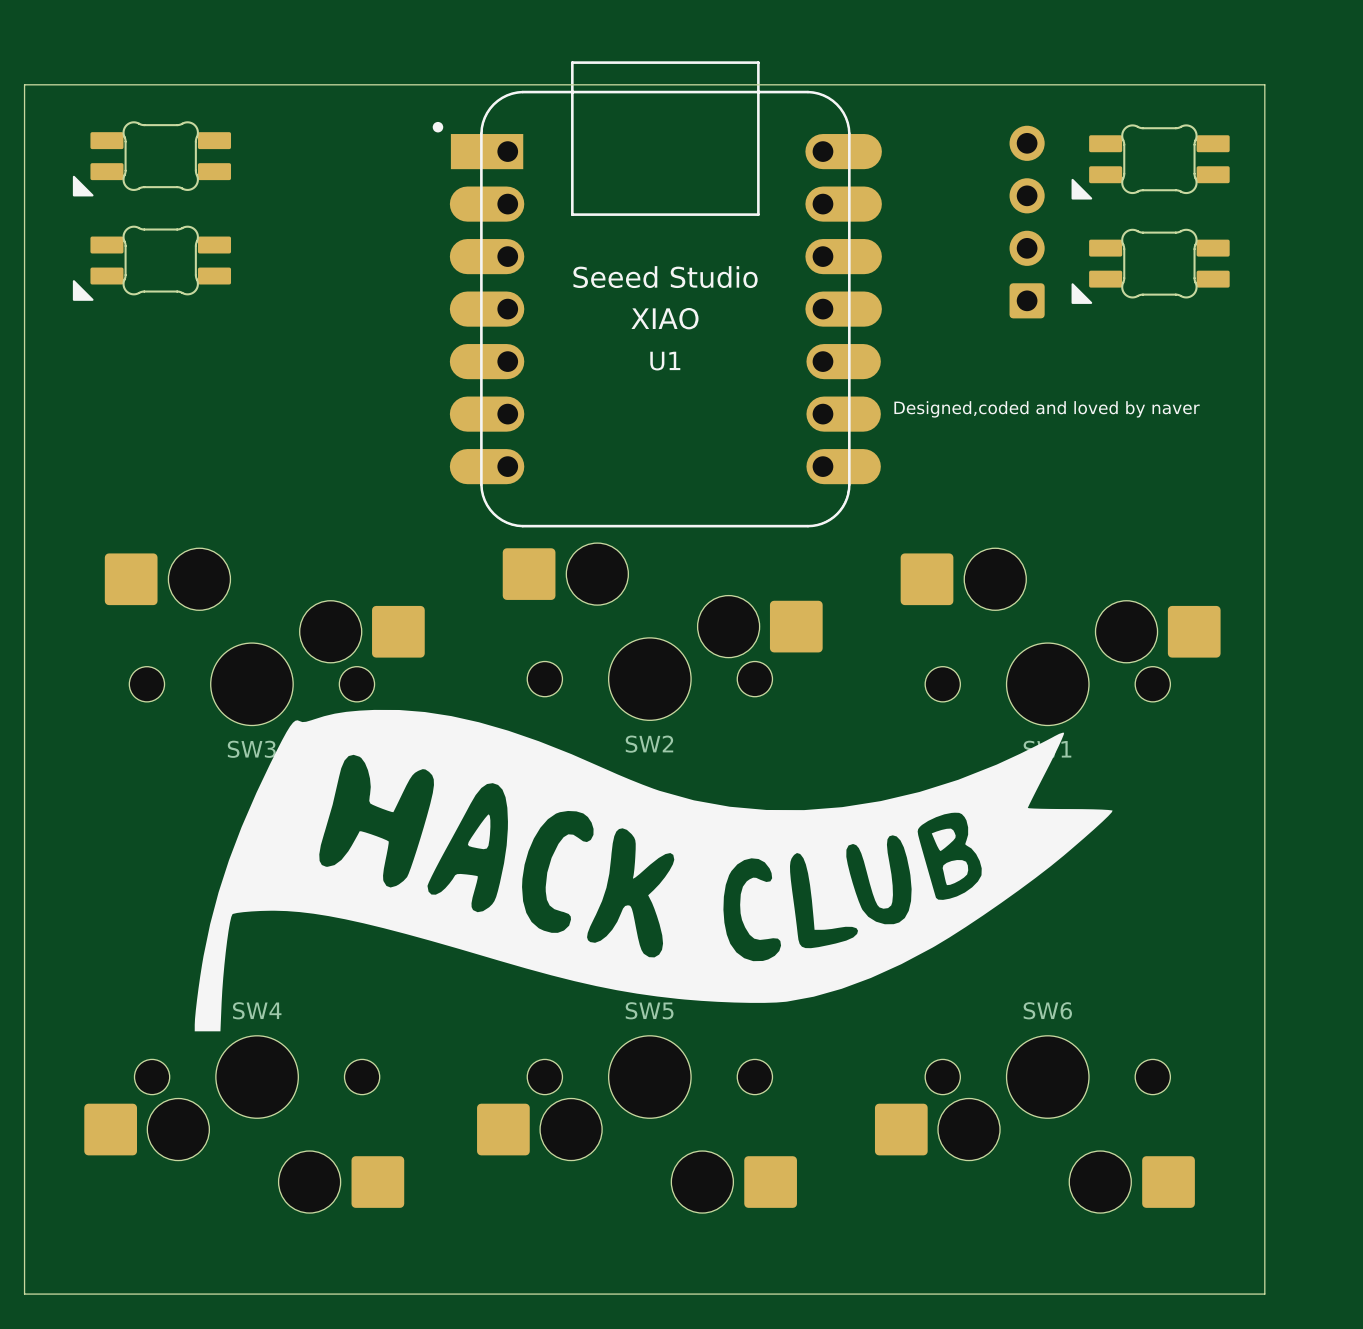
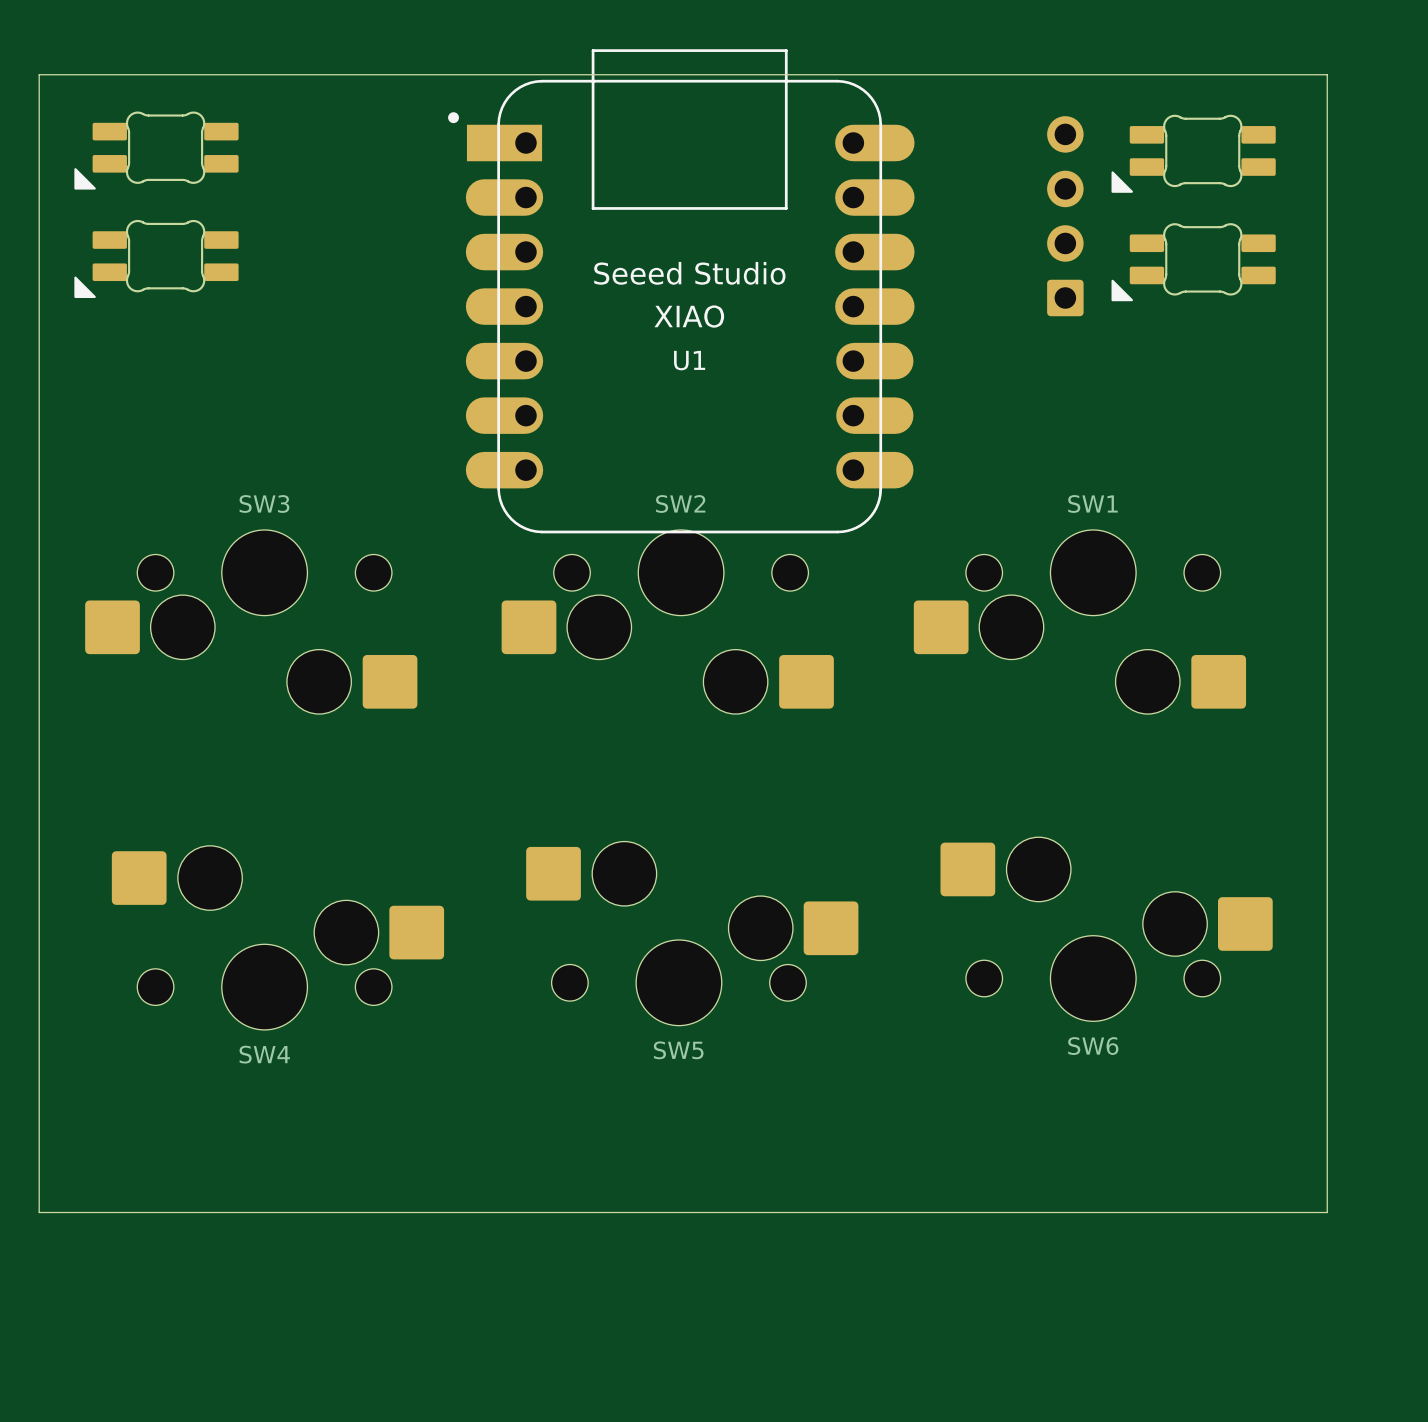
board edge: (24, 84) (1264, 84) (1264, 1294) (24, 1294) (24, 84) -> (39, 74) (39, 1212) (1327, 1212) (1327, 74) (39, 74)
text: Designed,coded and loved by naver (1047, 409) -> none
SW2 rotation: 0° (662, 631) -> 180° (667, 622)
SW3 rotation: 0° (264, 636) -> 180° (251, 622)
SW1 rotation: 0° (1060, 636) -> 180° (1079, 622)
drawing: [194, 709, 1113, 1032] -> none
SW4 rotation: 0° (244, 1124) -> 180° (277, 937)
SW4 position: (244, 1124) -> (277, 937)
SW5 rotation: 0° (637, 1124) -> 180° (692, 933)
SW5 position: (637, 1124) -> (692, 933)
SW6 rotation: 0° (1034, 1124) -> 180° (1106, 929)
SW6 position: (1034, 1124) -> (1106, 929)

